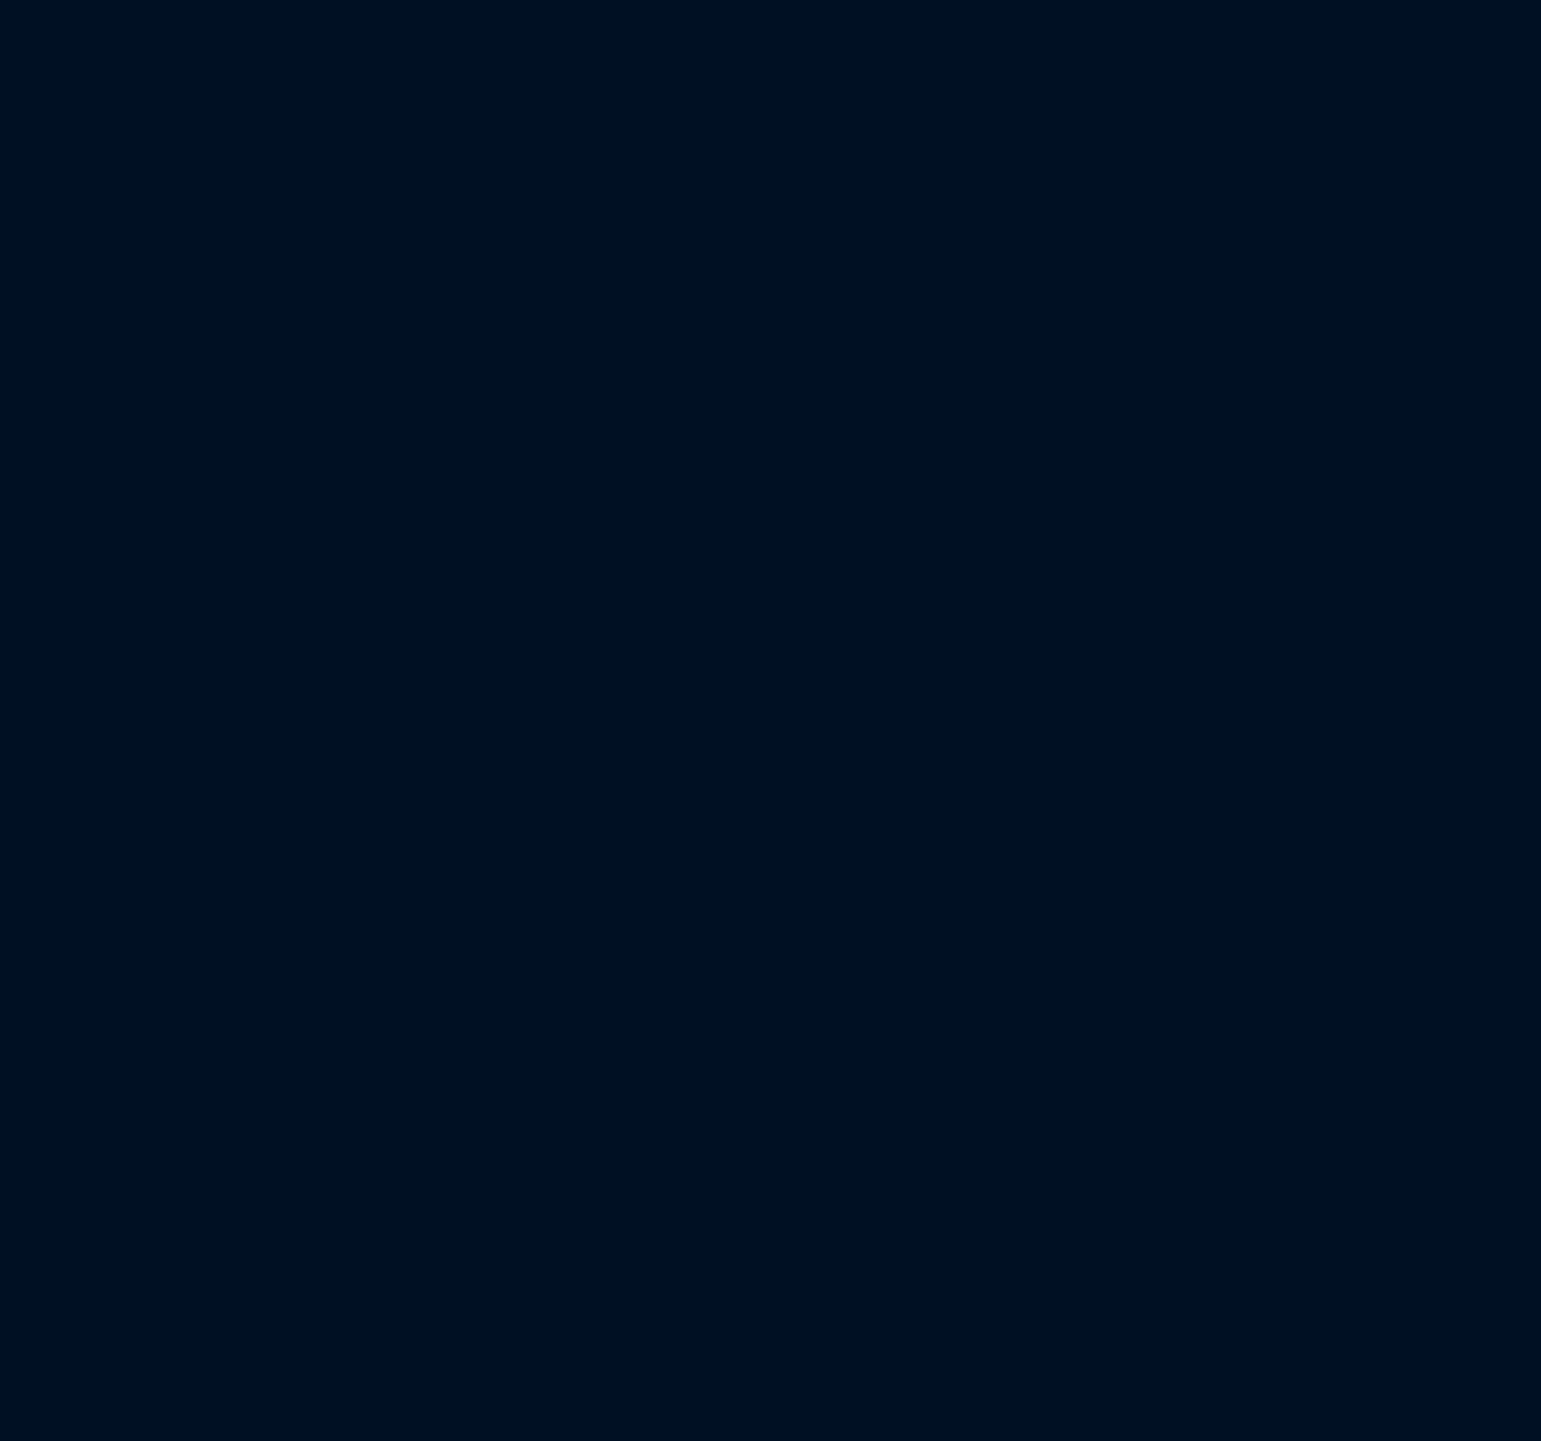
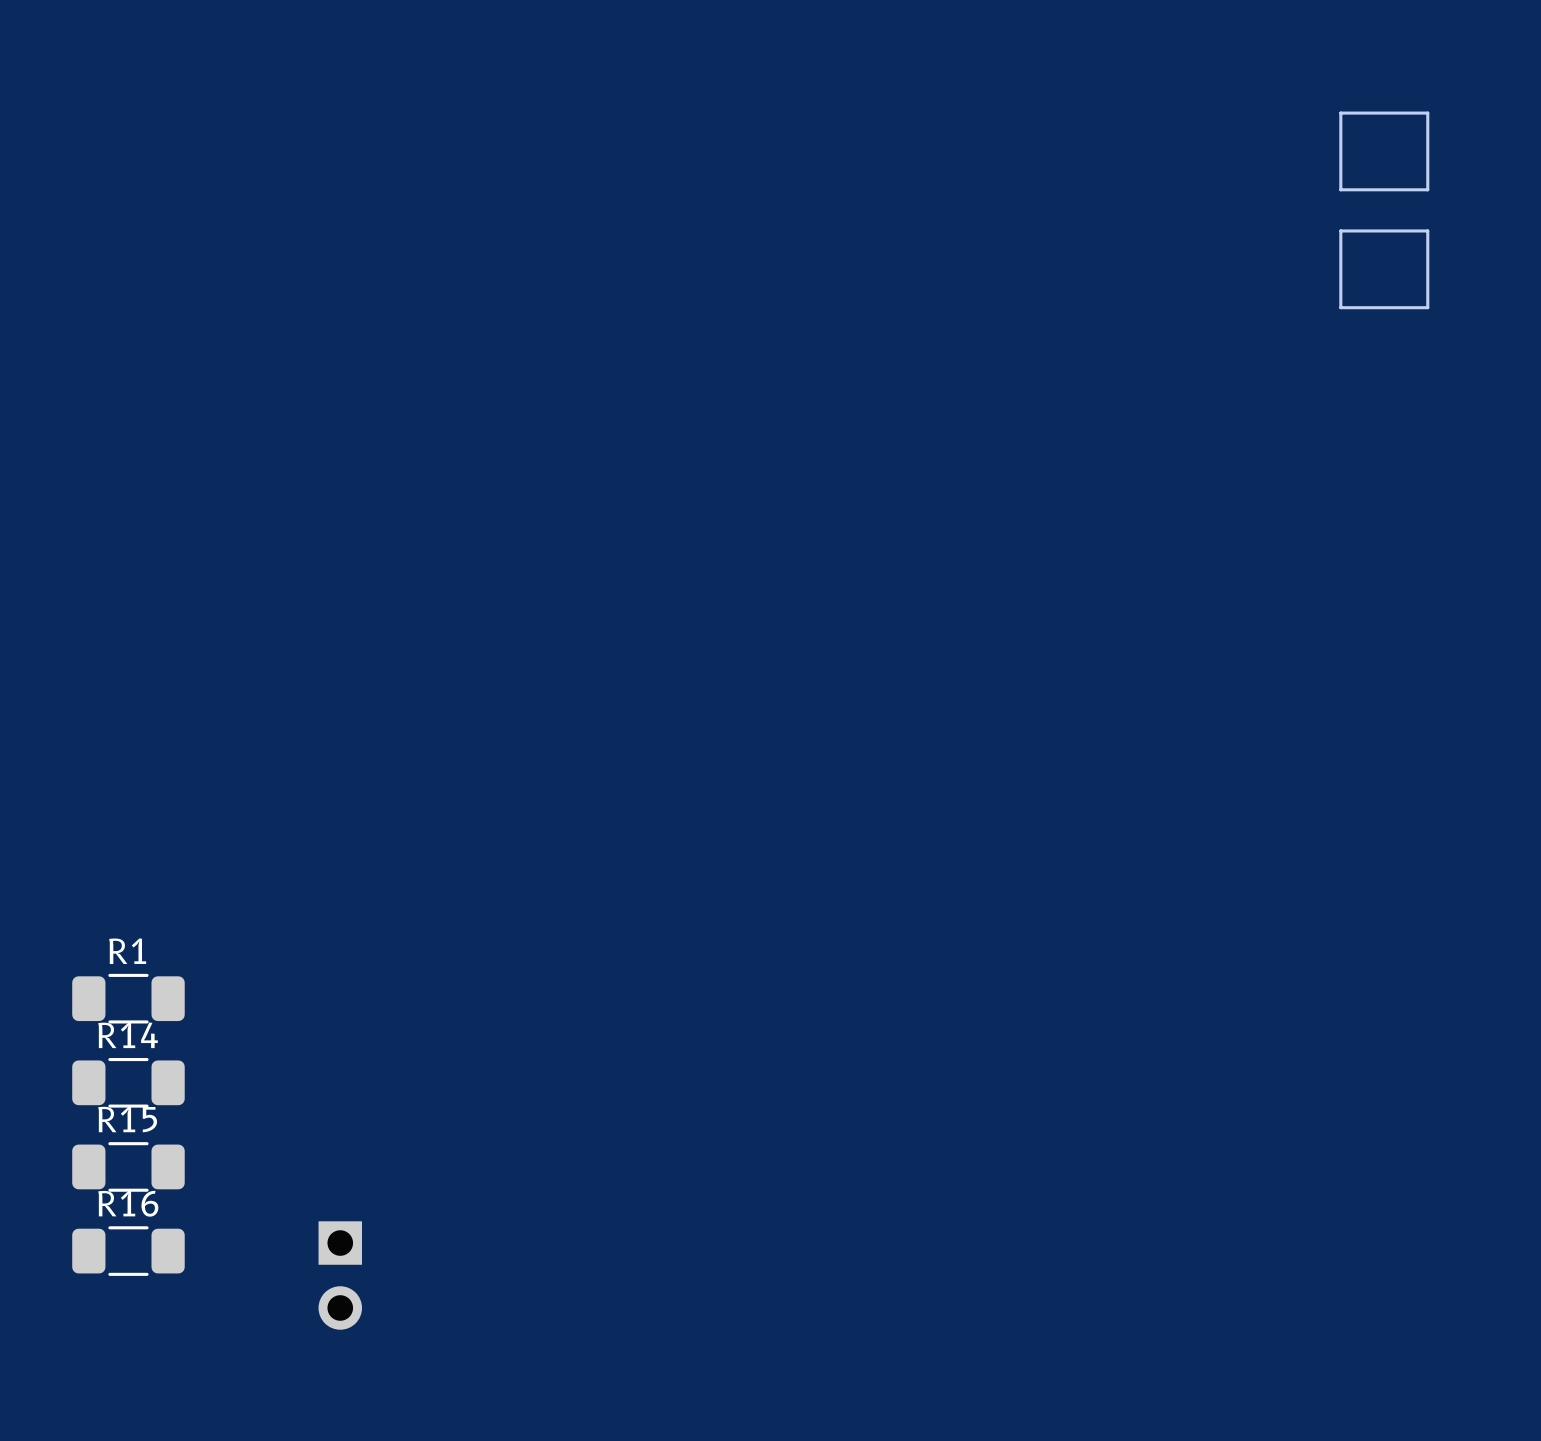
part: none -> (1384, 151)
part: none -> (1384, 269)
R1: none -> (128, 998)
R14: none -> (128, 1082)
R15: none -> (128, 1166)
R16: none -> (128, 1251)
part: none -> (340, 1275)

